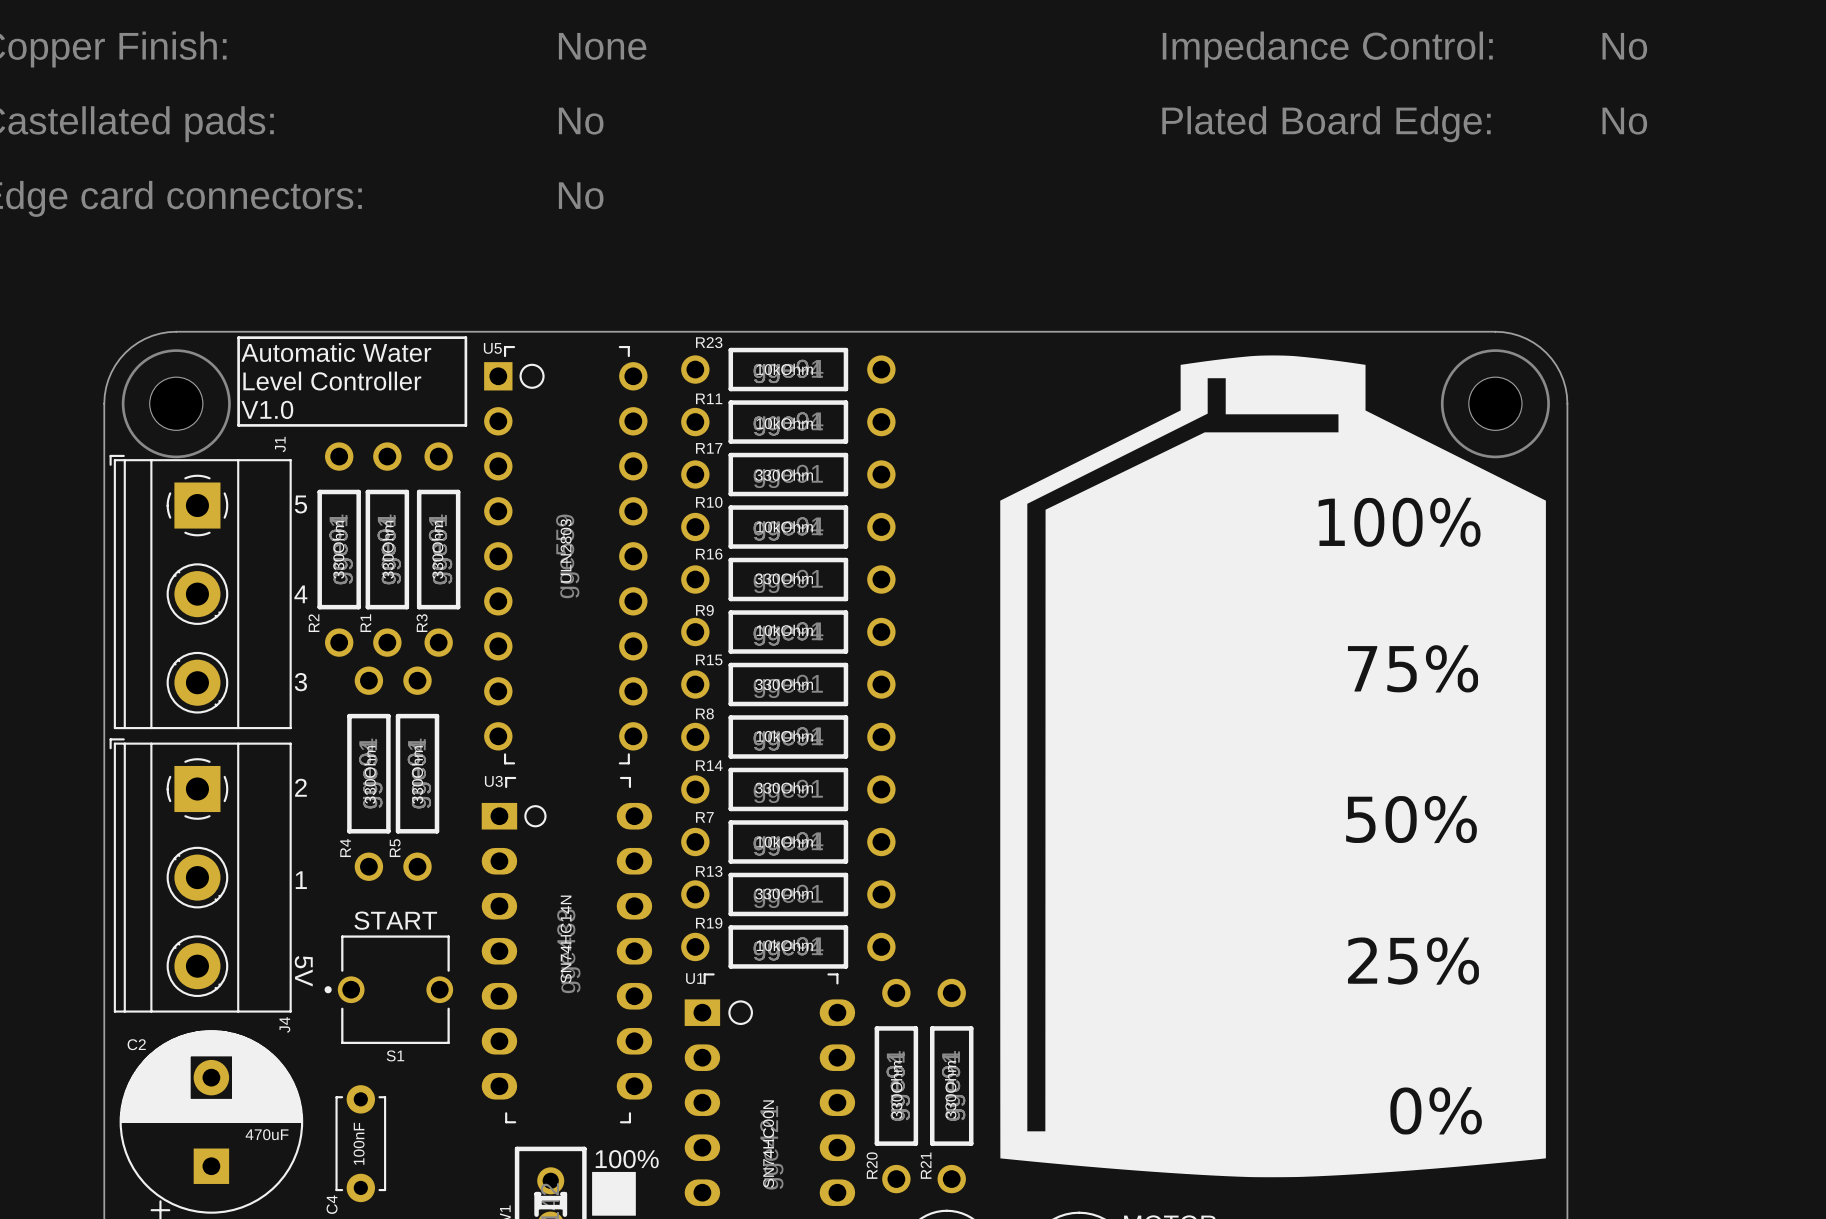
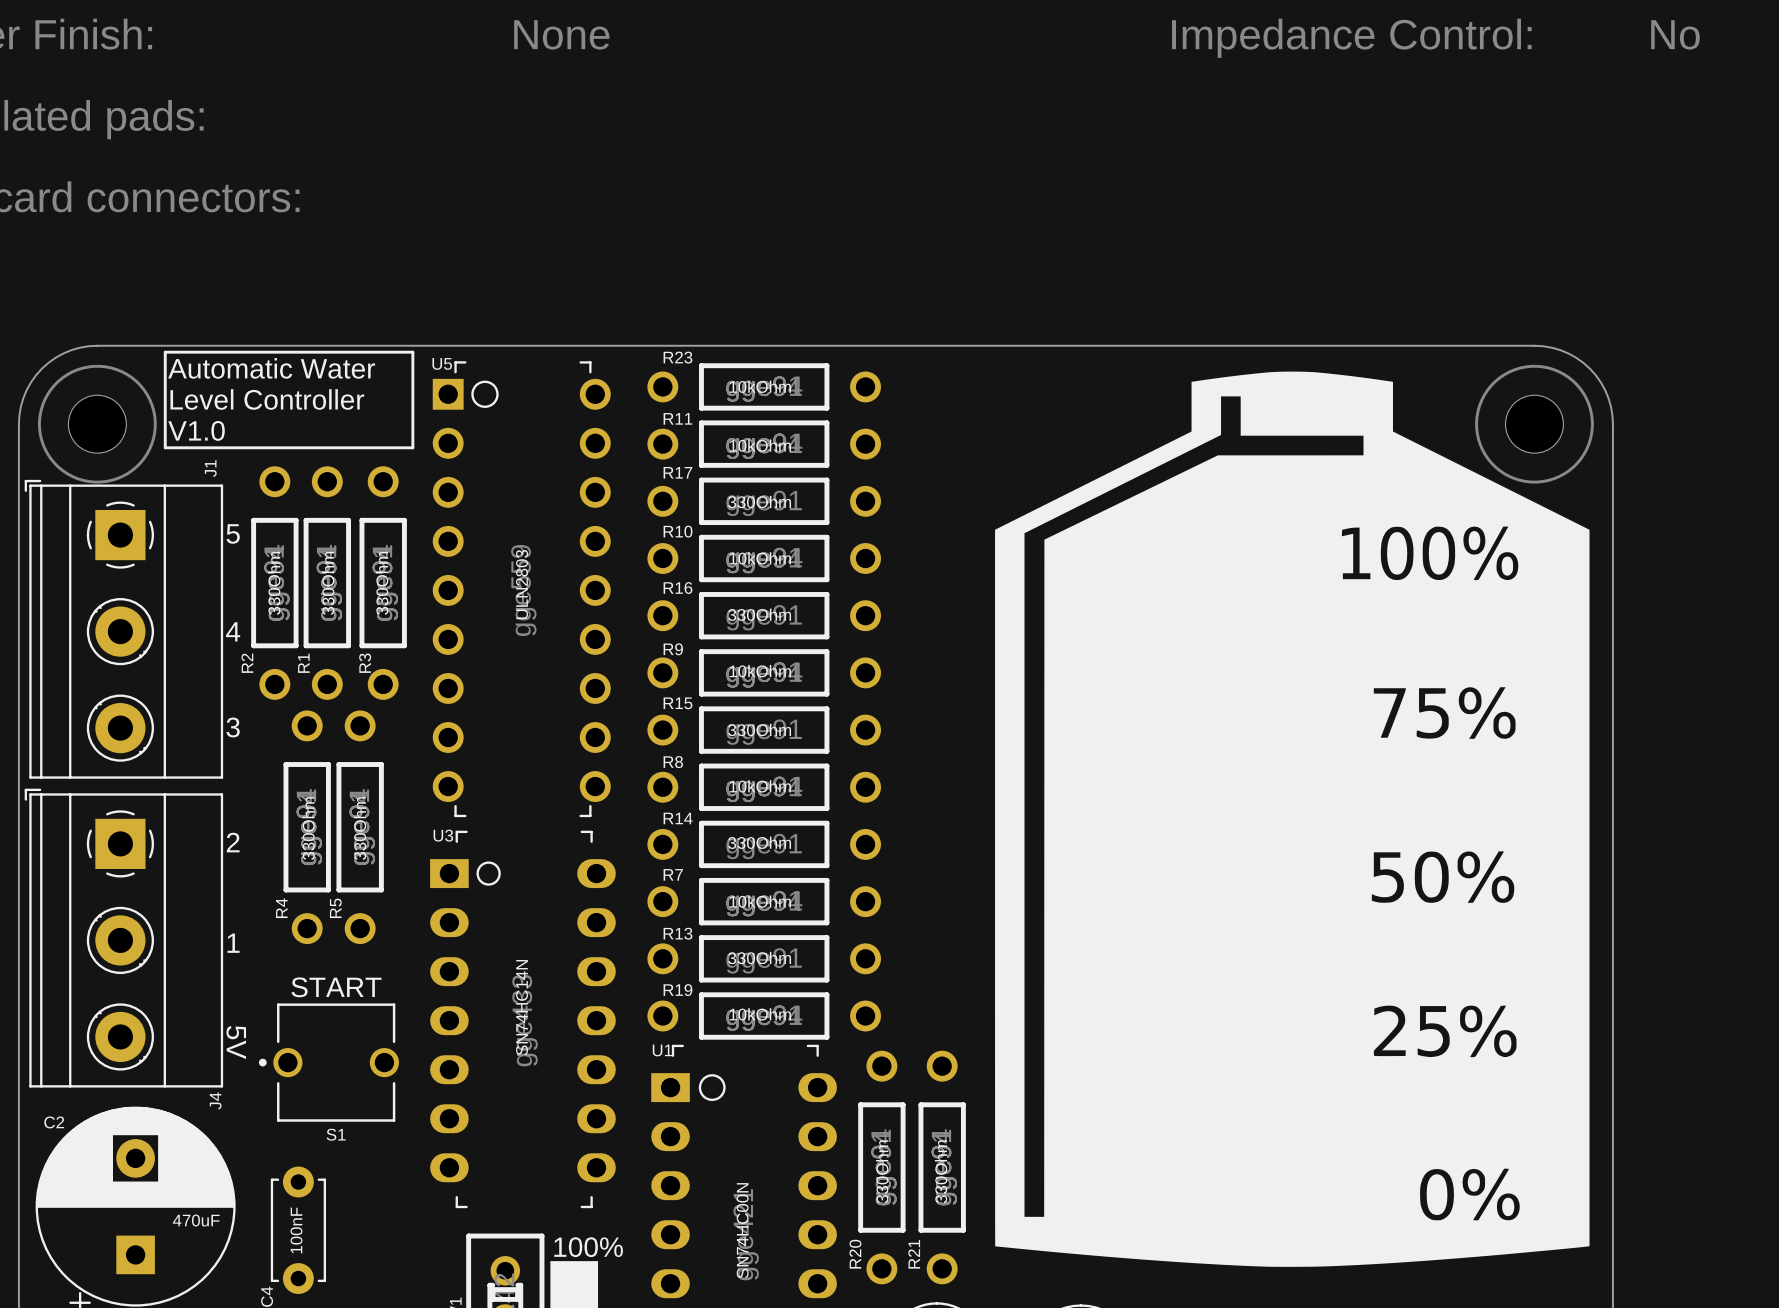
text: No (581, 121) -> none
text: No (1624, 121) -> none
text: Plated Board Edge: (1326, 124) -> none
text: No (581, 195) -> none

